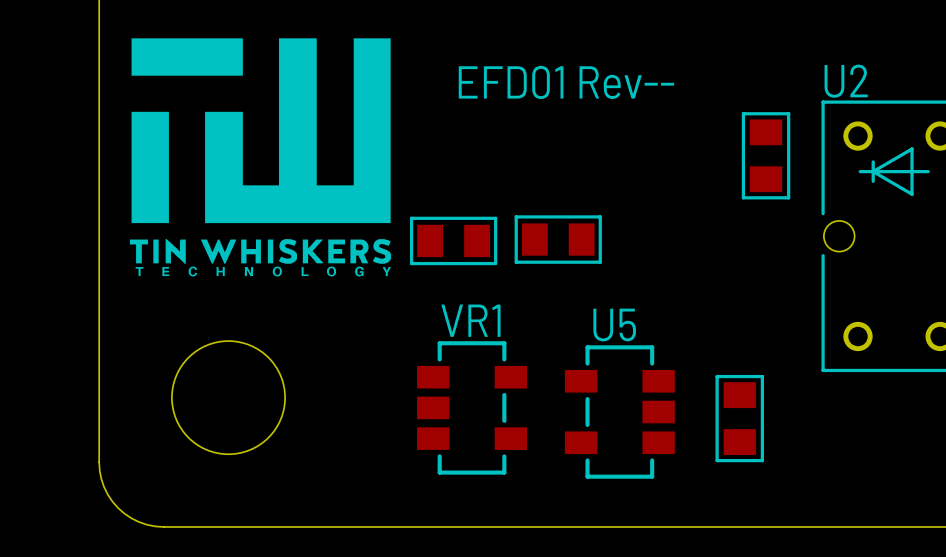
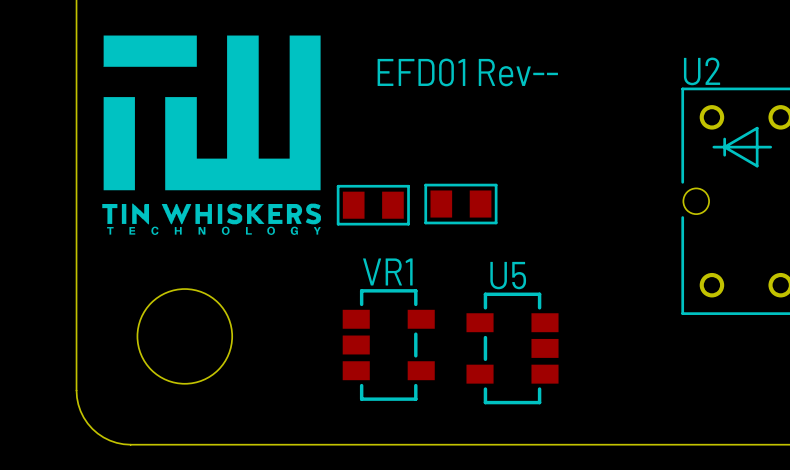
part: (766, 155) -> none
part: (739, 418) -> none

